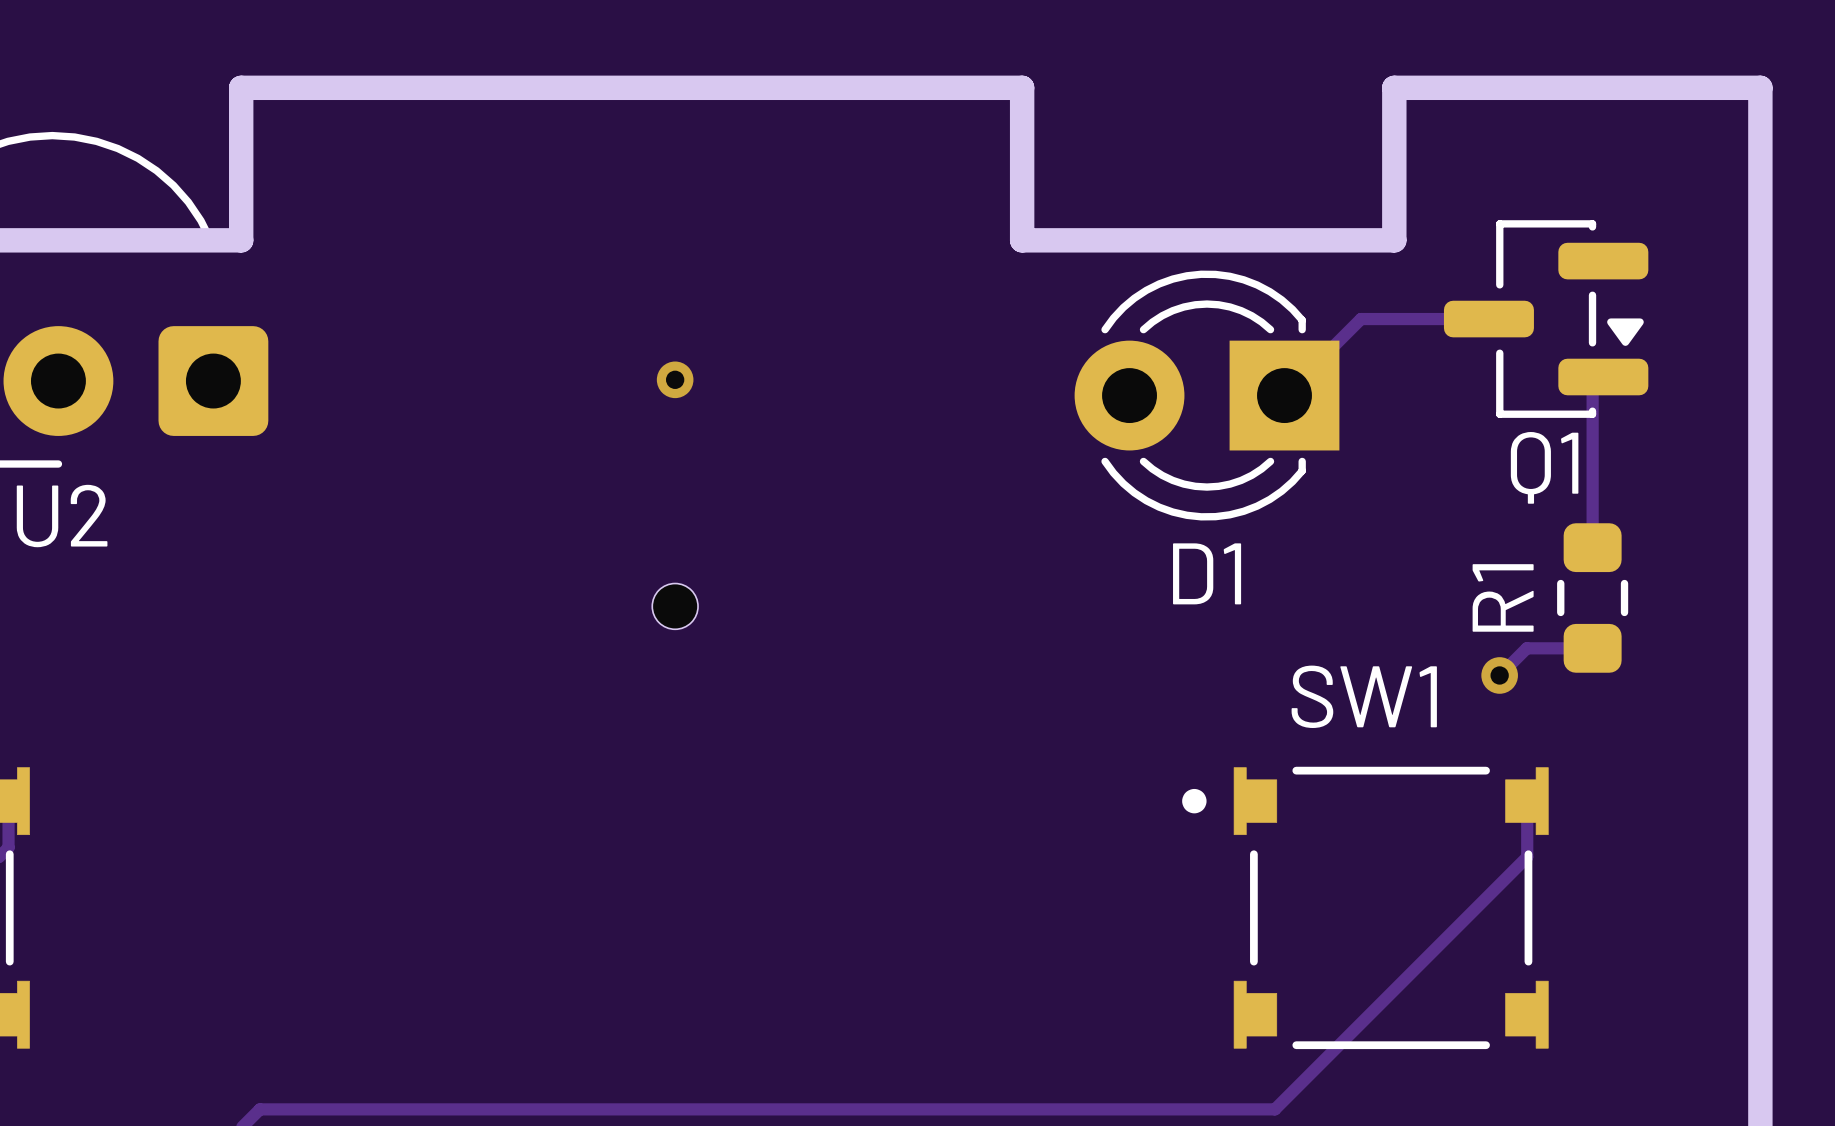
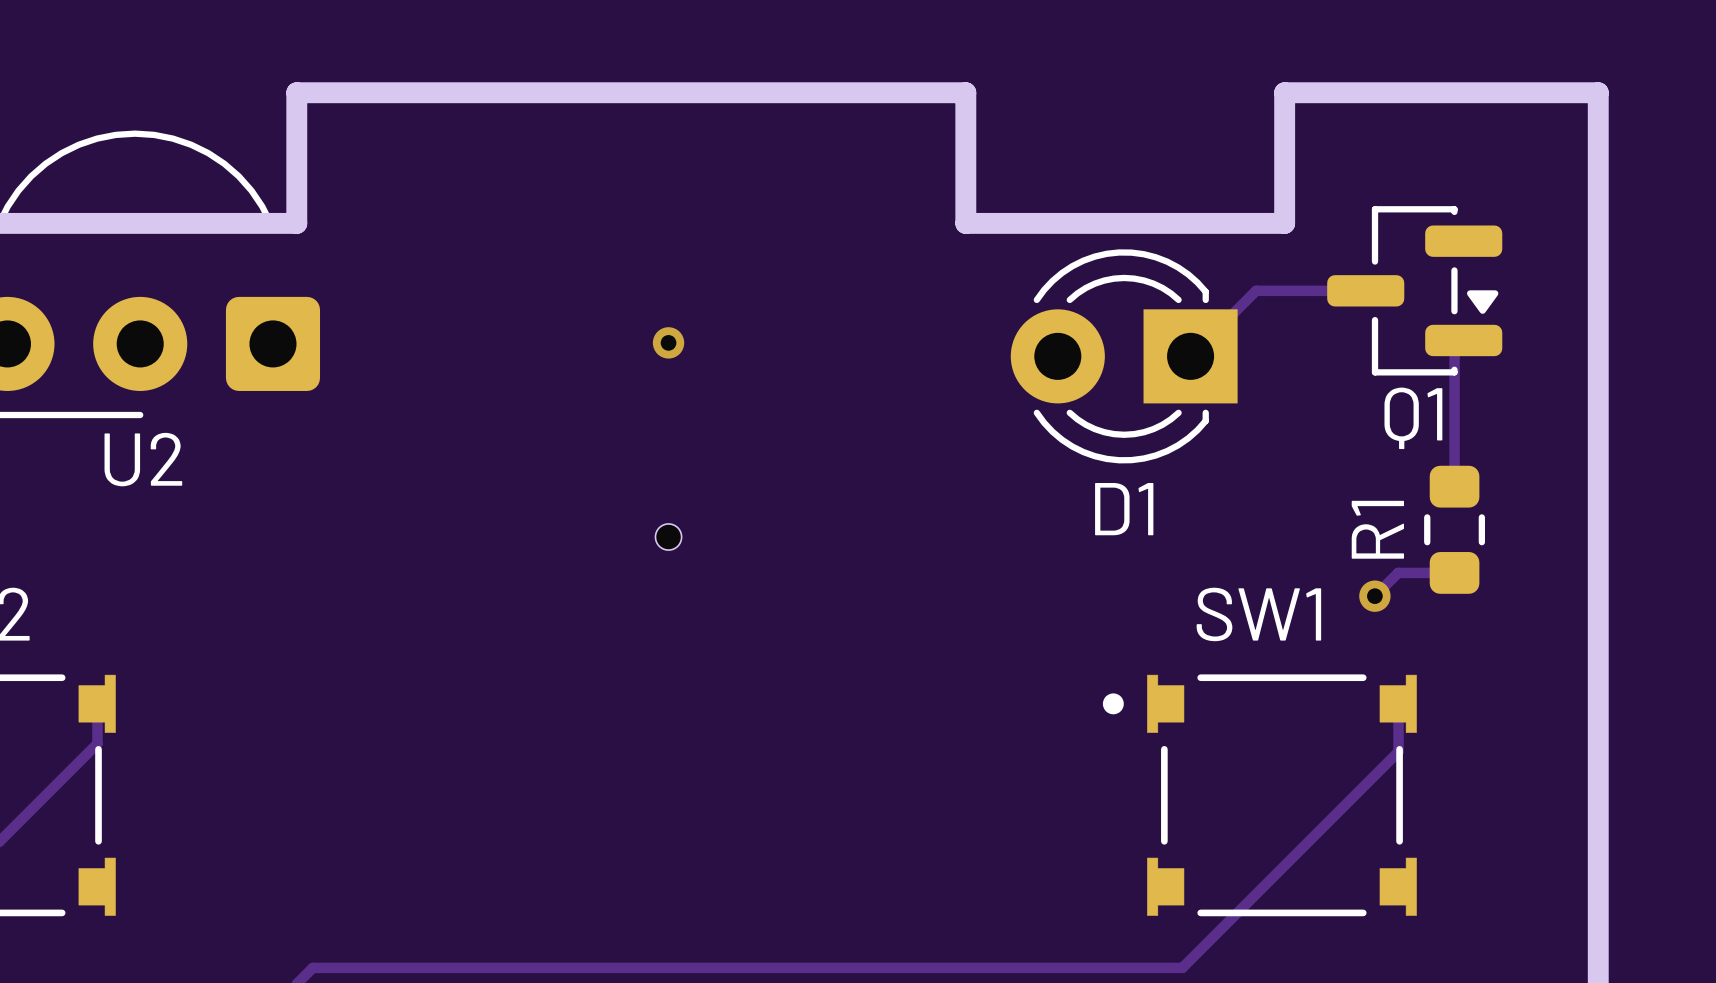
part footprint: [652, 583, 699, 630] -> [655, 523, 682, 551]

